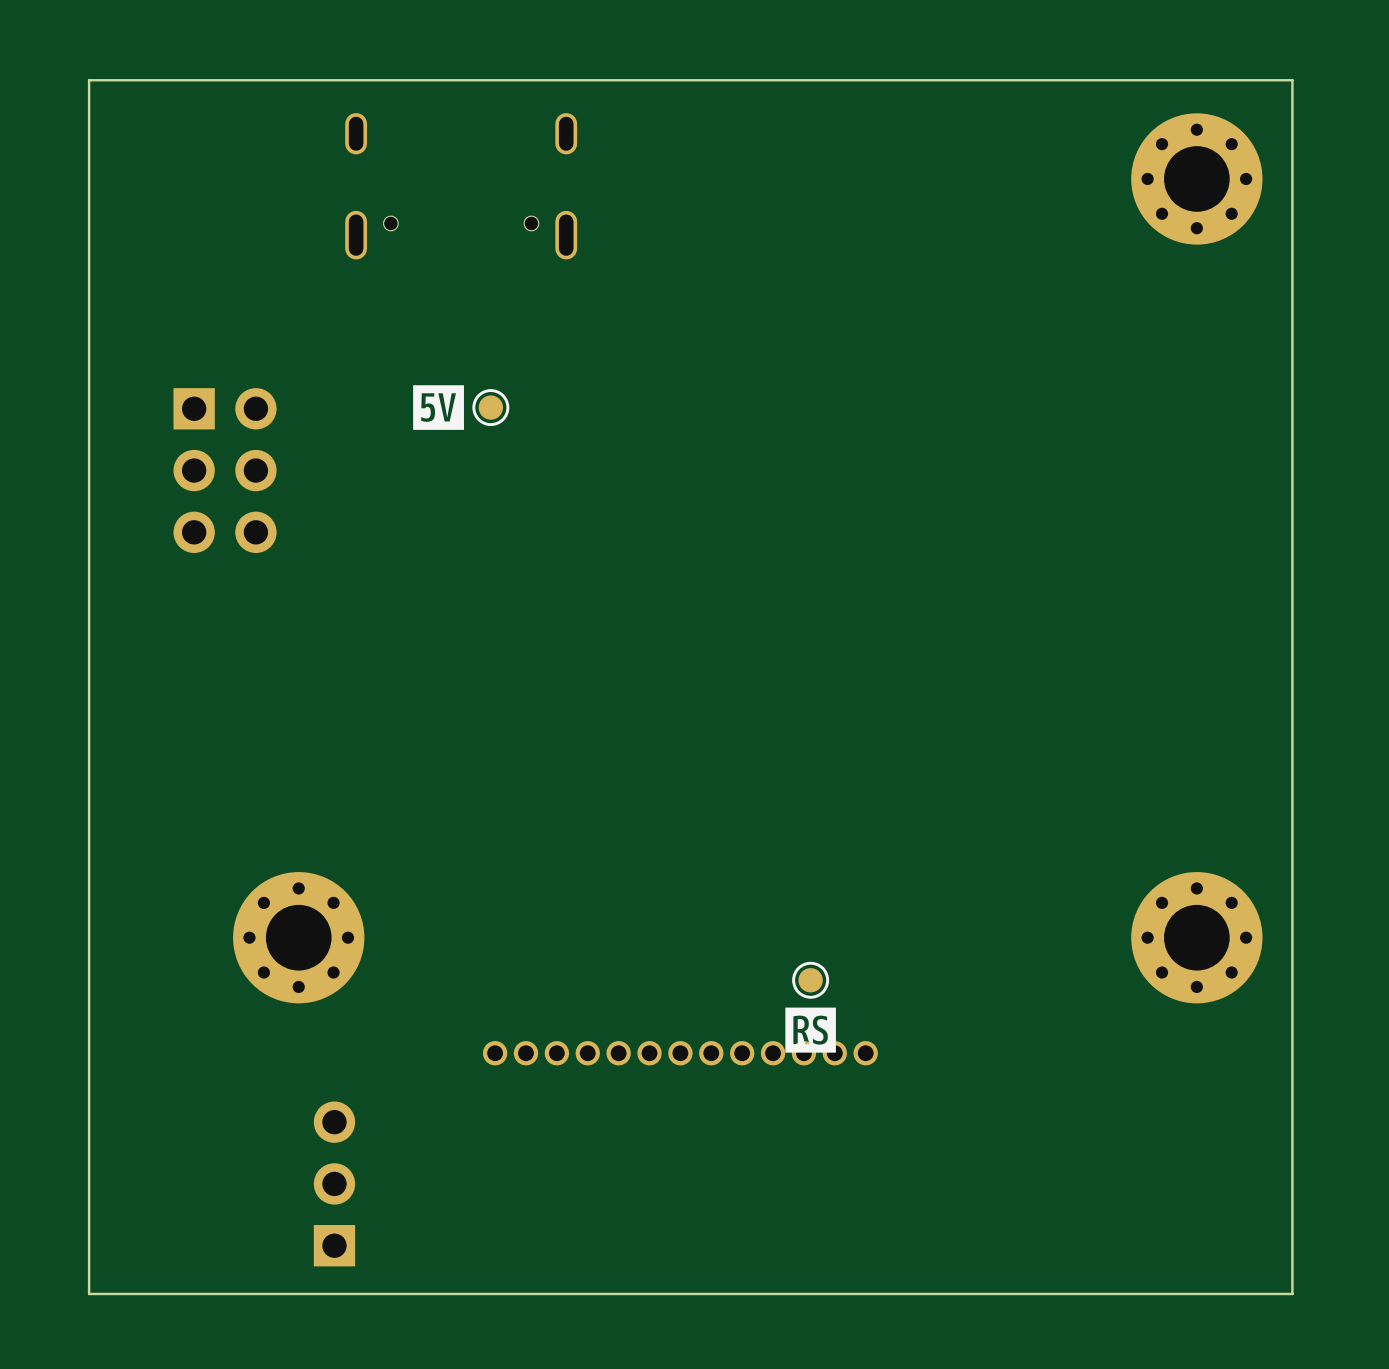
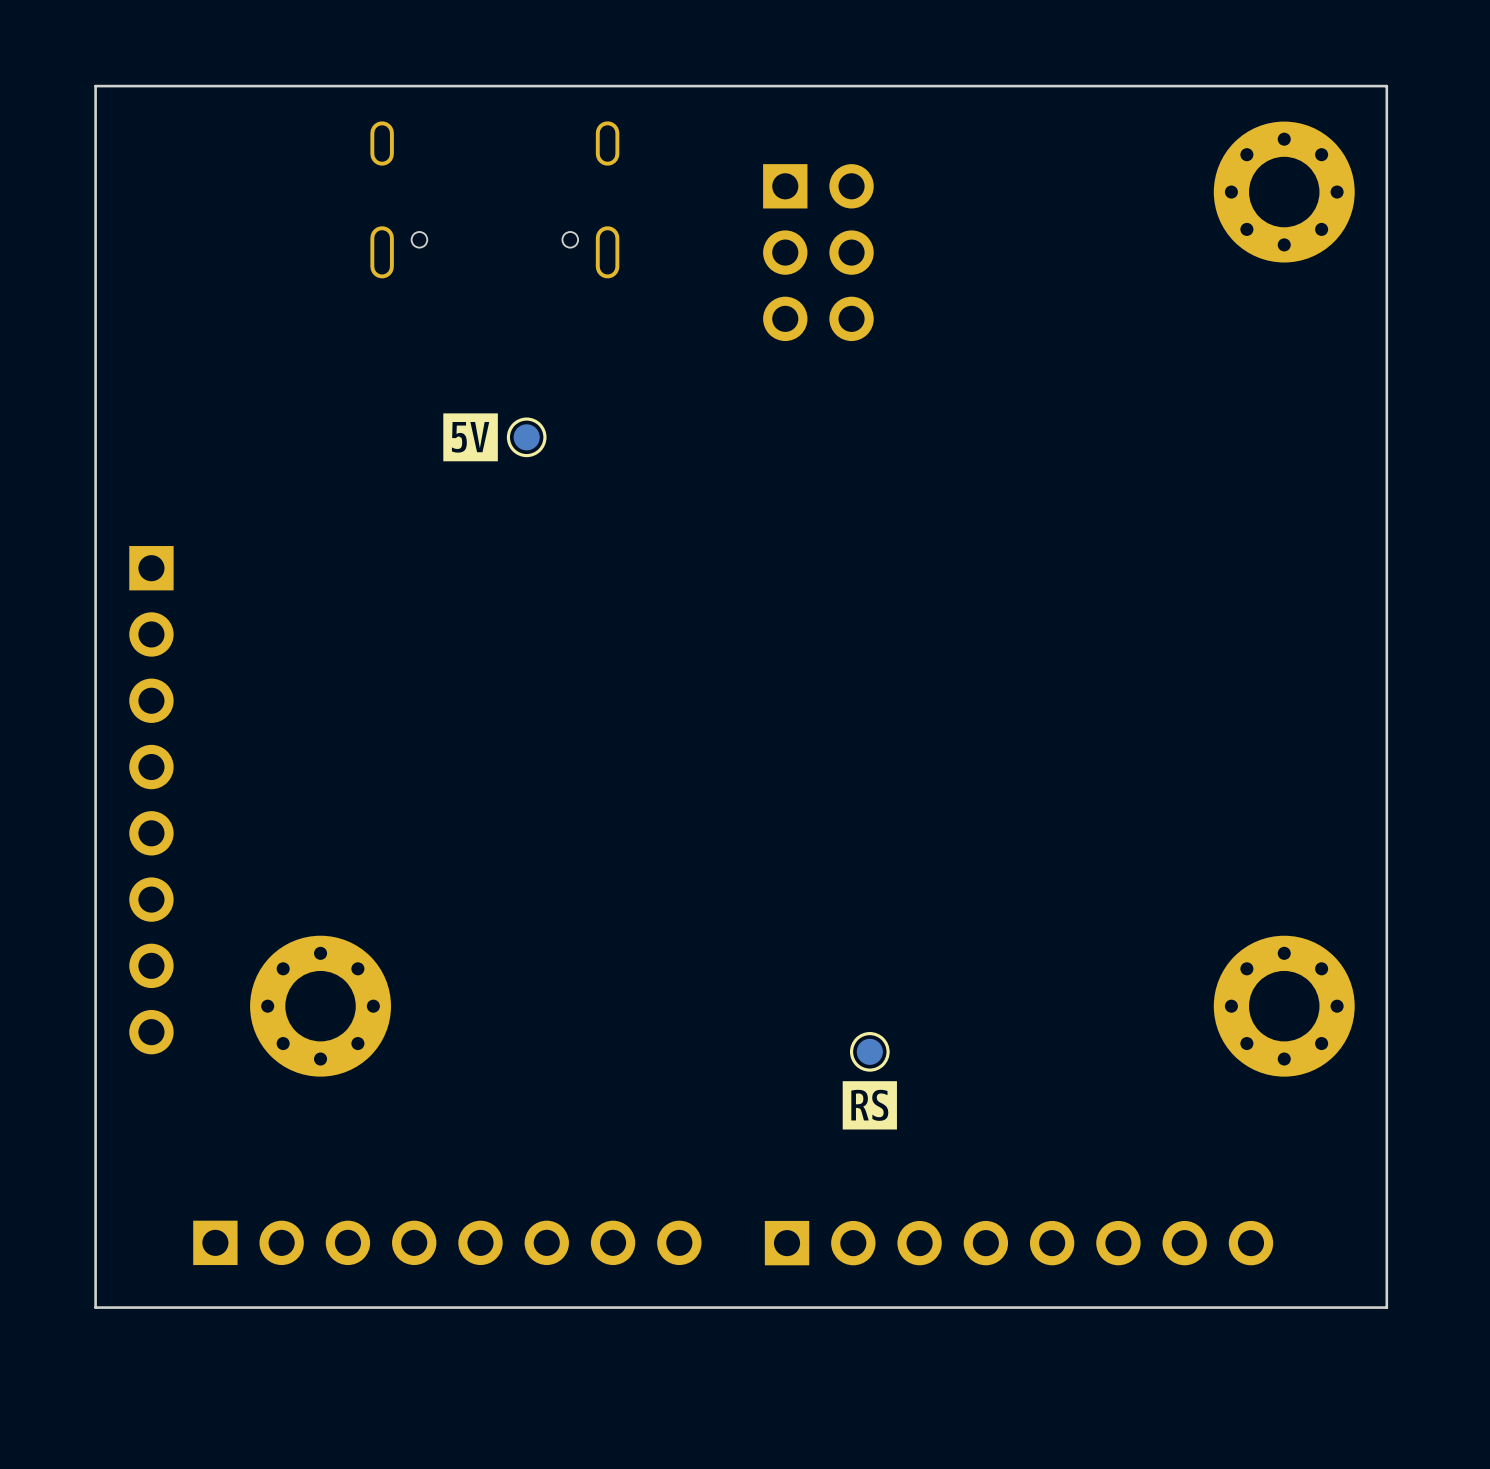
part position: (225, 470) -> (818, 252)
part: none -> (151, 800)
part: (680, 1053) -> none
part: none -> (447, 1242)
part: none -> (1019, 1243)
part: (334, 1183) -> none
board edge: (1292, 1218) (1292, 1293) (89, 1293) (89, 1218) -> (1386, 1307) (95, 1307)

